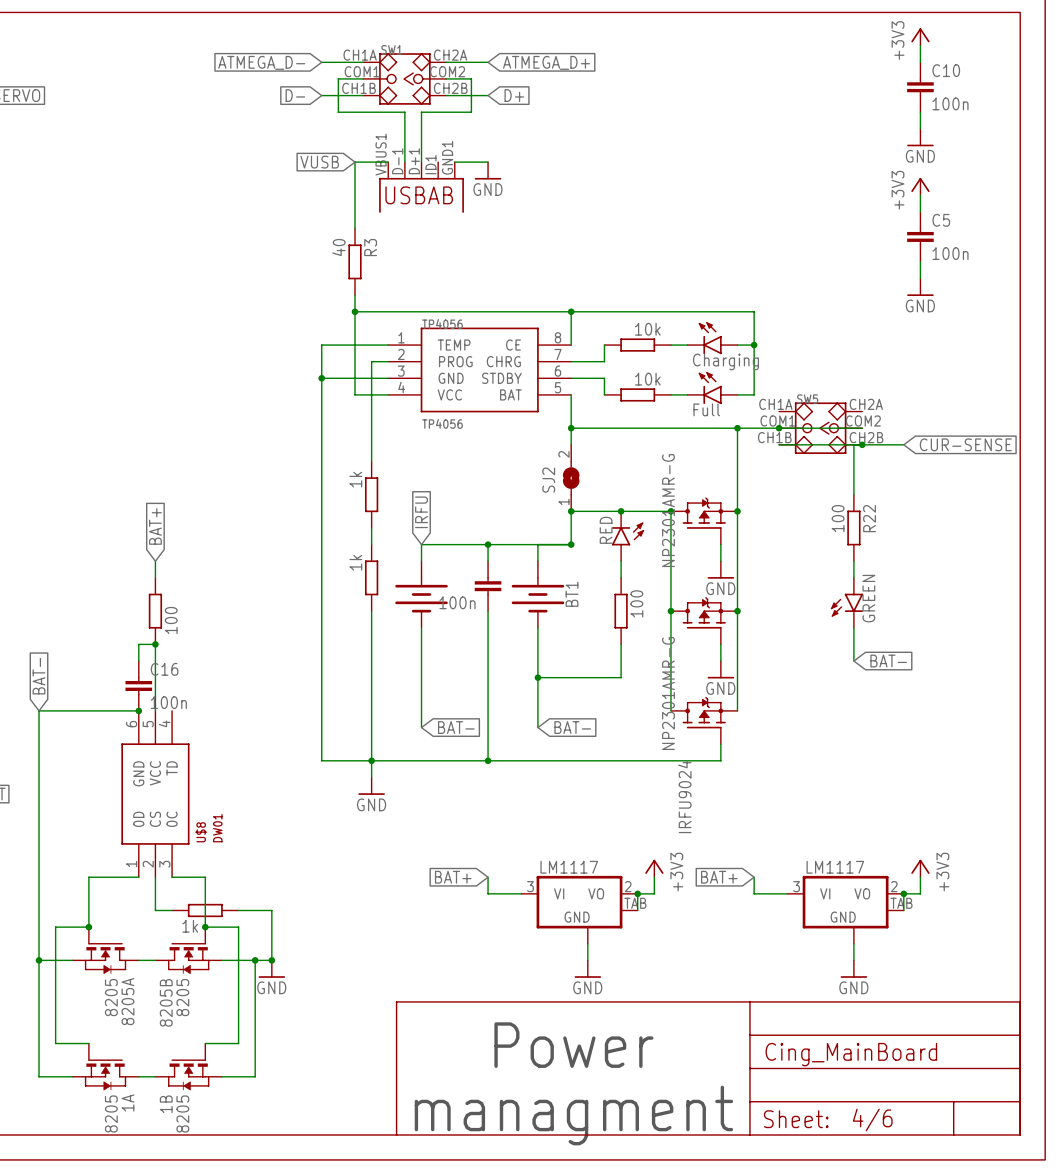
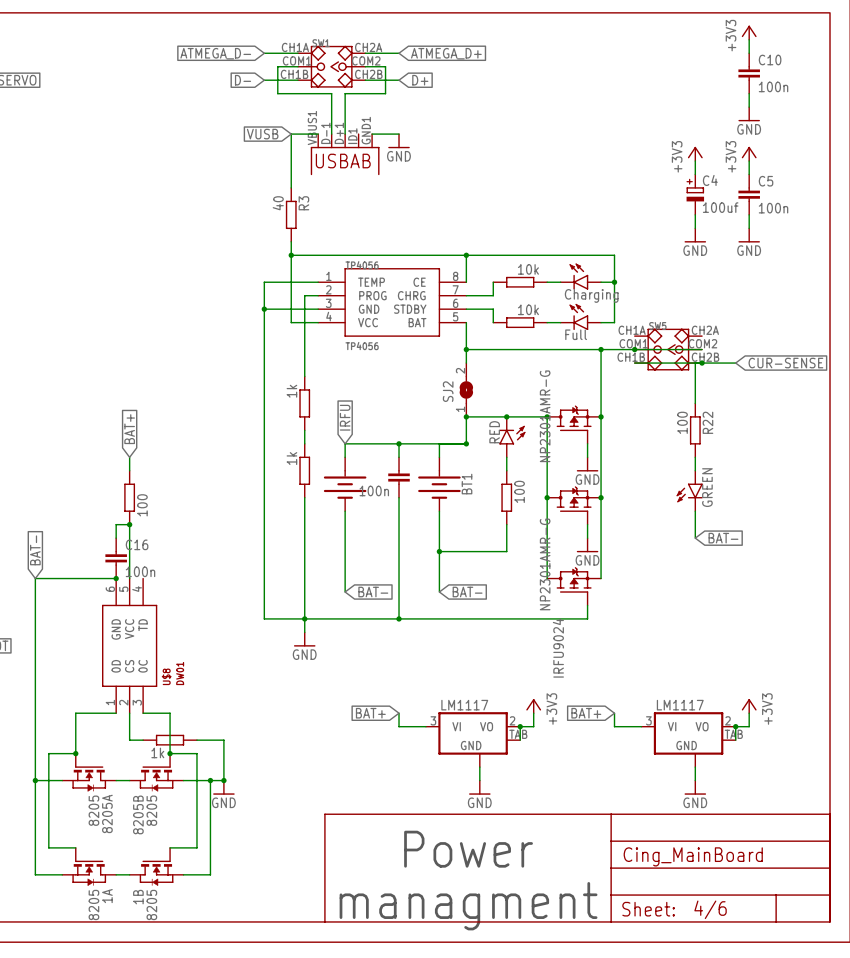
power symbol: none -> +3V3 (695, 153)
wire: none -> (695, 161) (695, 174)
C4: none -> 100uf (695, 194)
wire: none -> (695, 214) (695, 228)
power symbol: none -> GND (695, 235)

